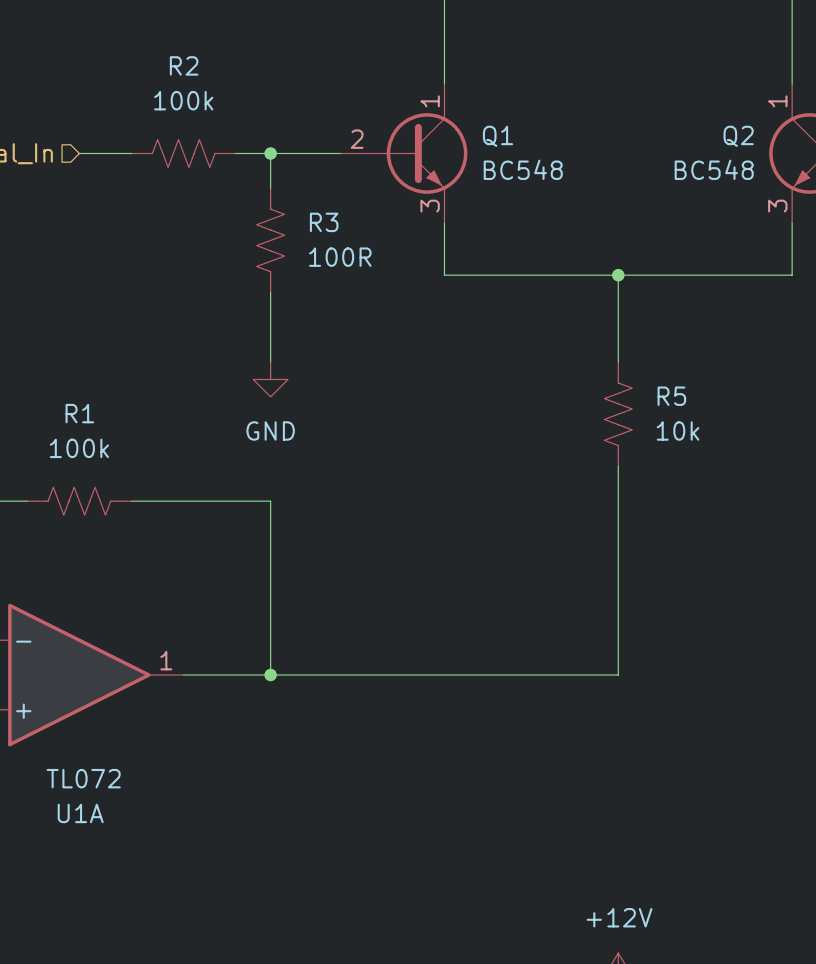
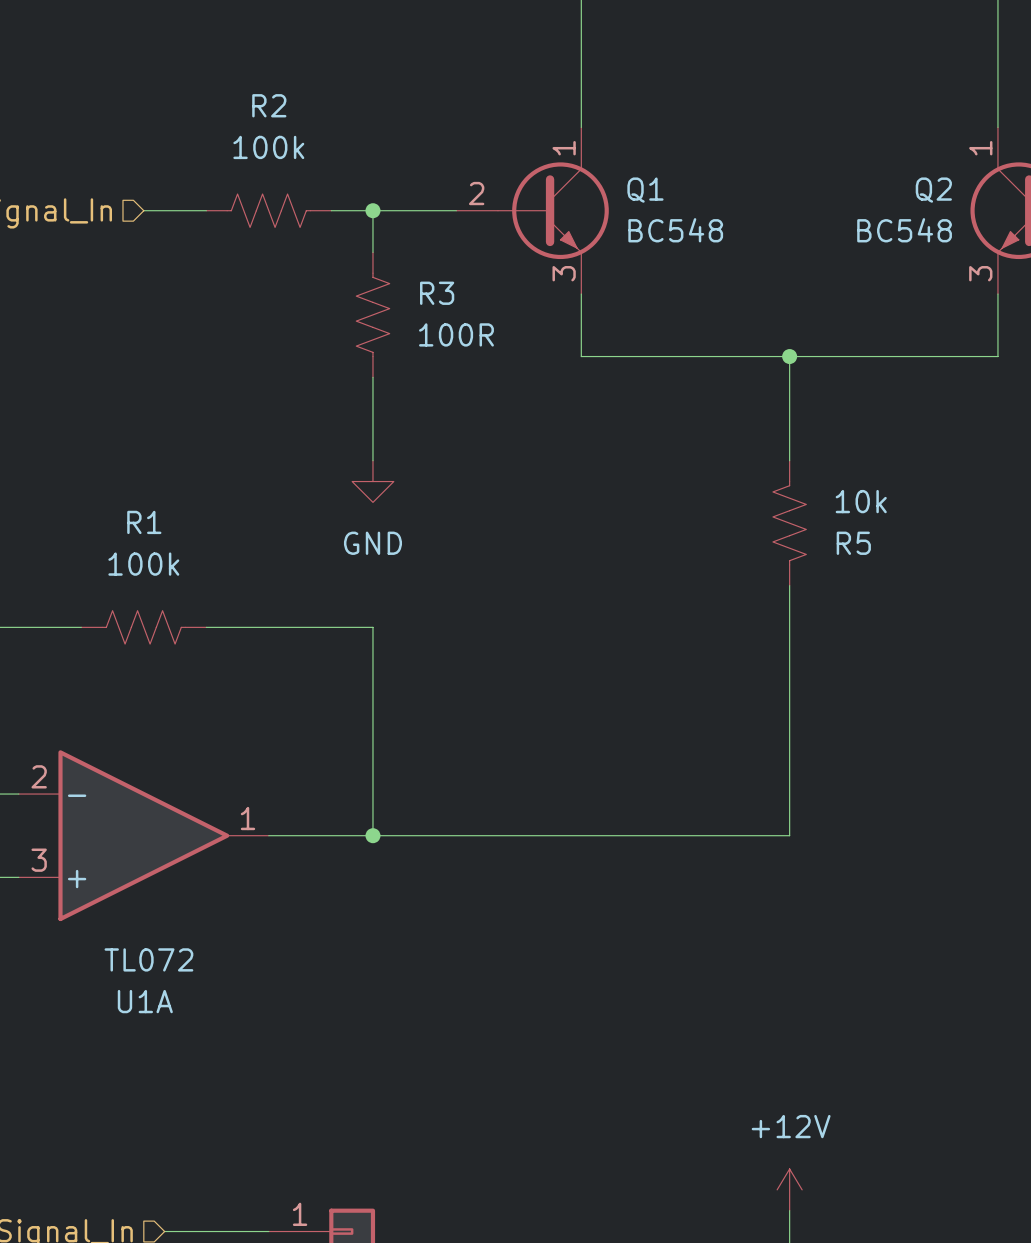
R5 name position: R5 (671, 396) -> R5 (853, 543)
R5 flip: as is (618, 414) -> left-right (789, 523)
R5 value position: 10k (678, 430) -> 10k (861, 501)

